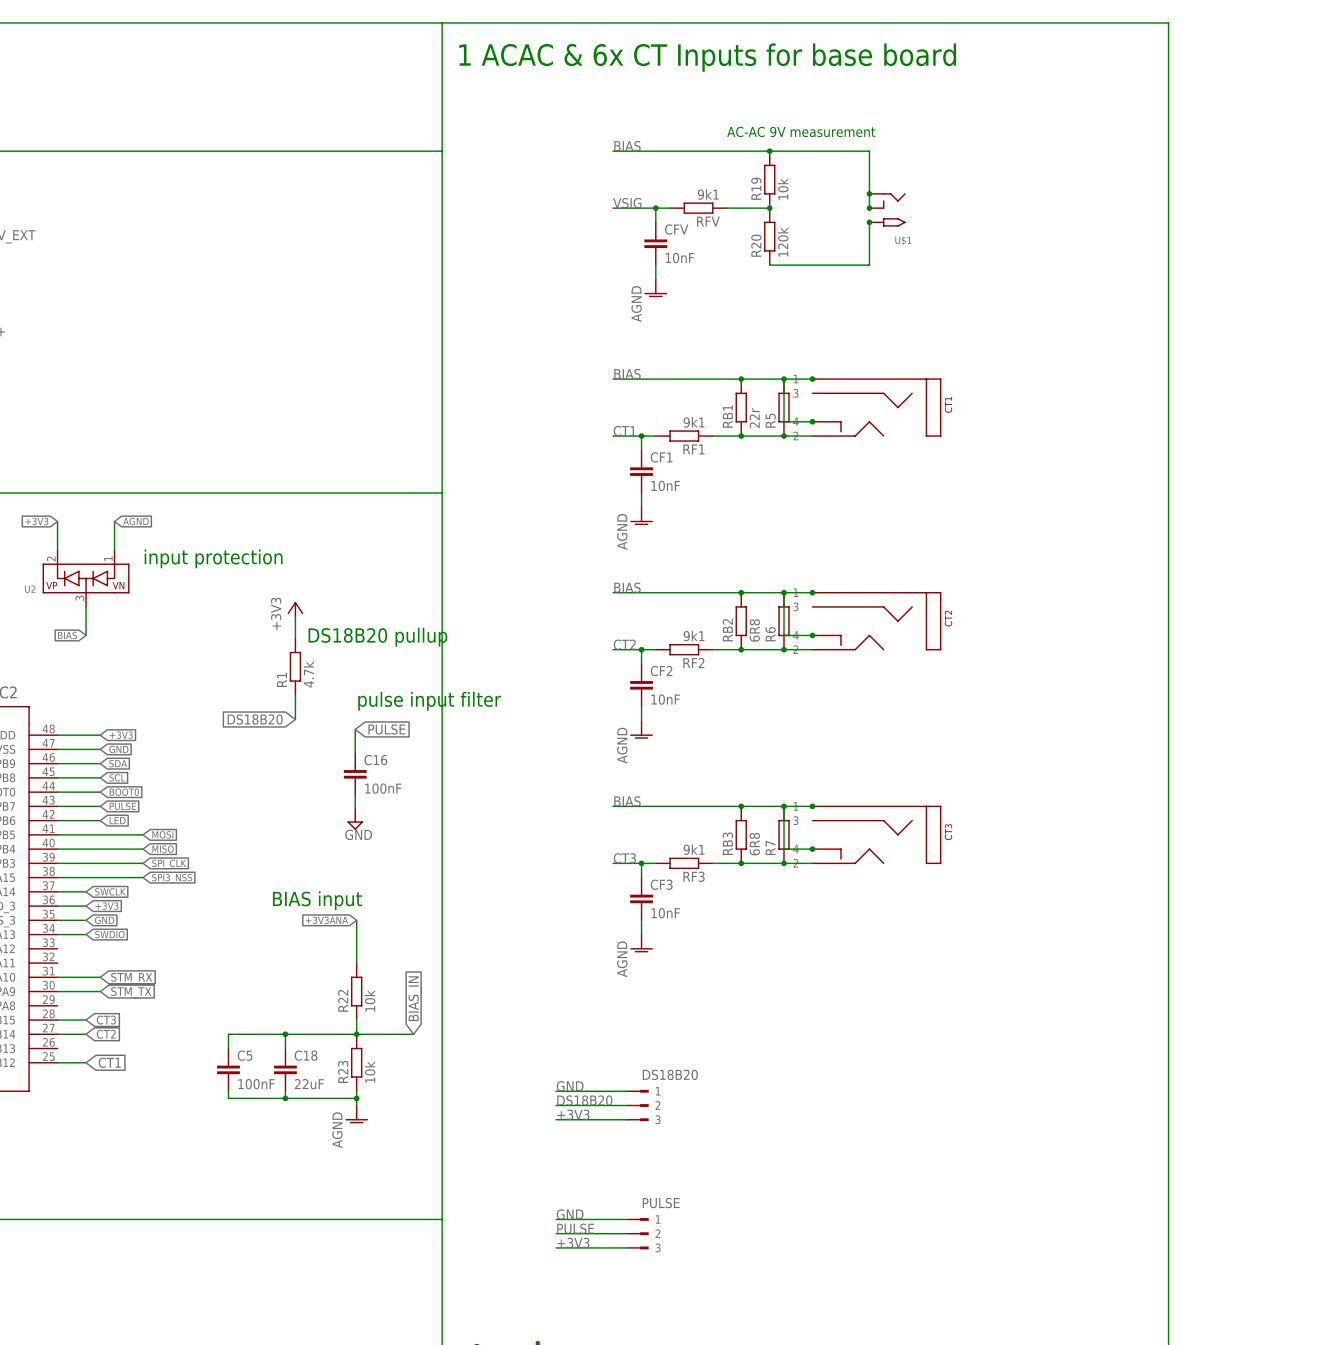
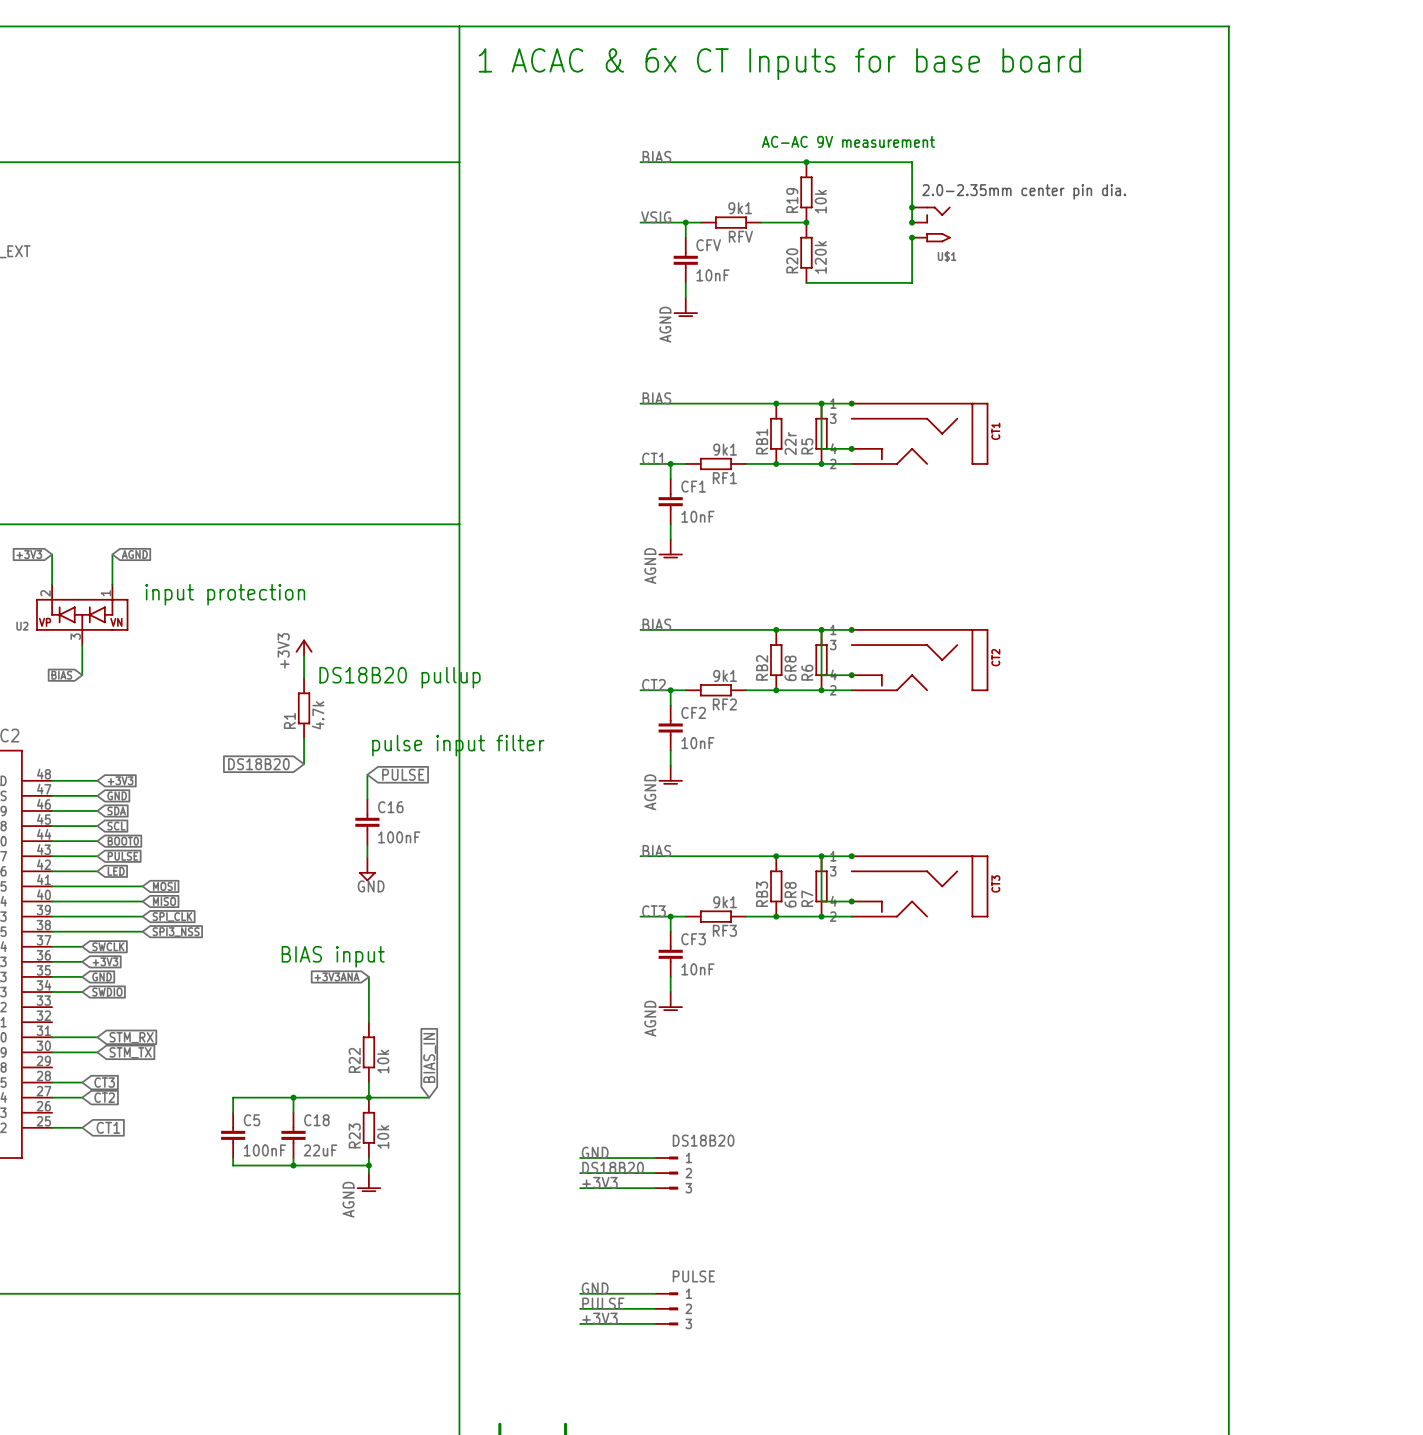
text: none -> 2.0-2.35mm center pin dia. (1024, 191)

